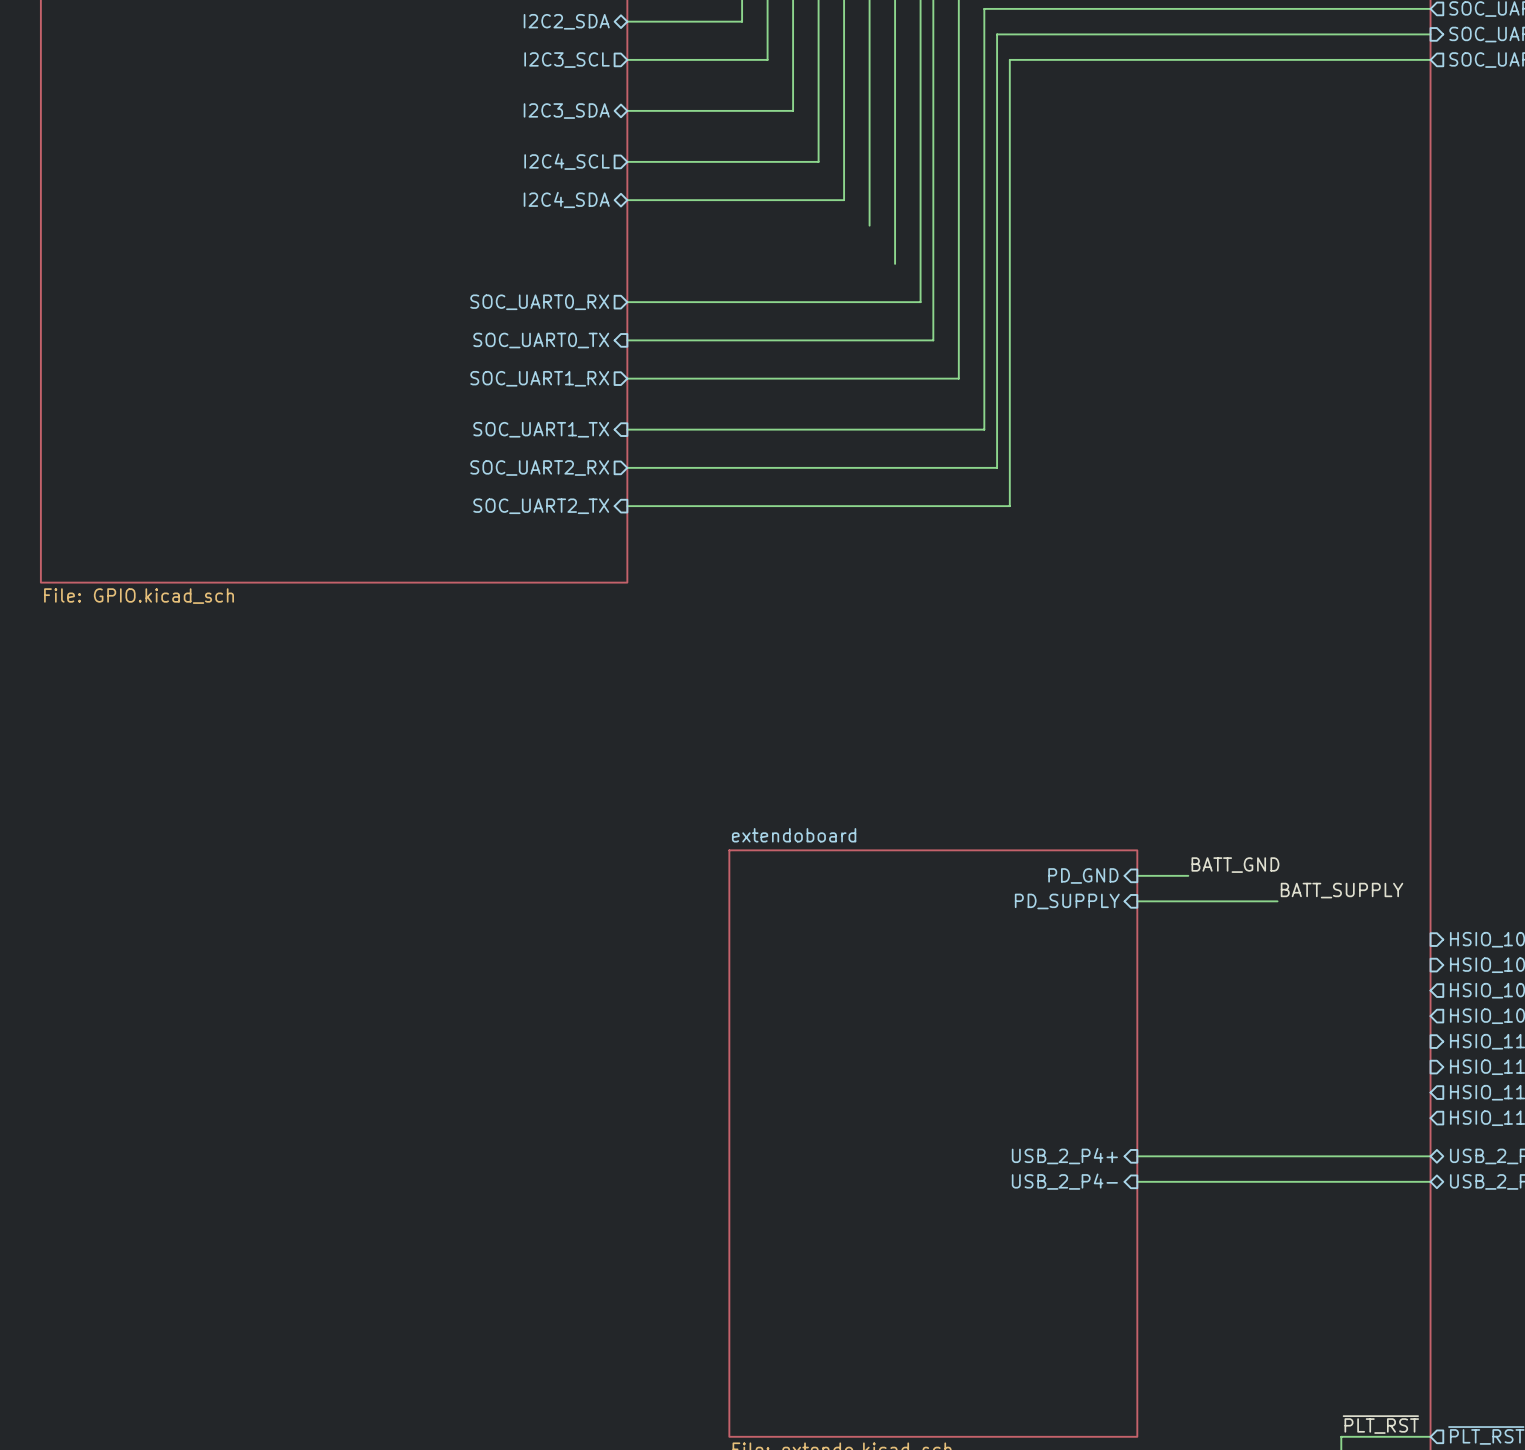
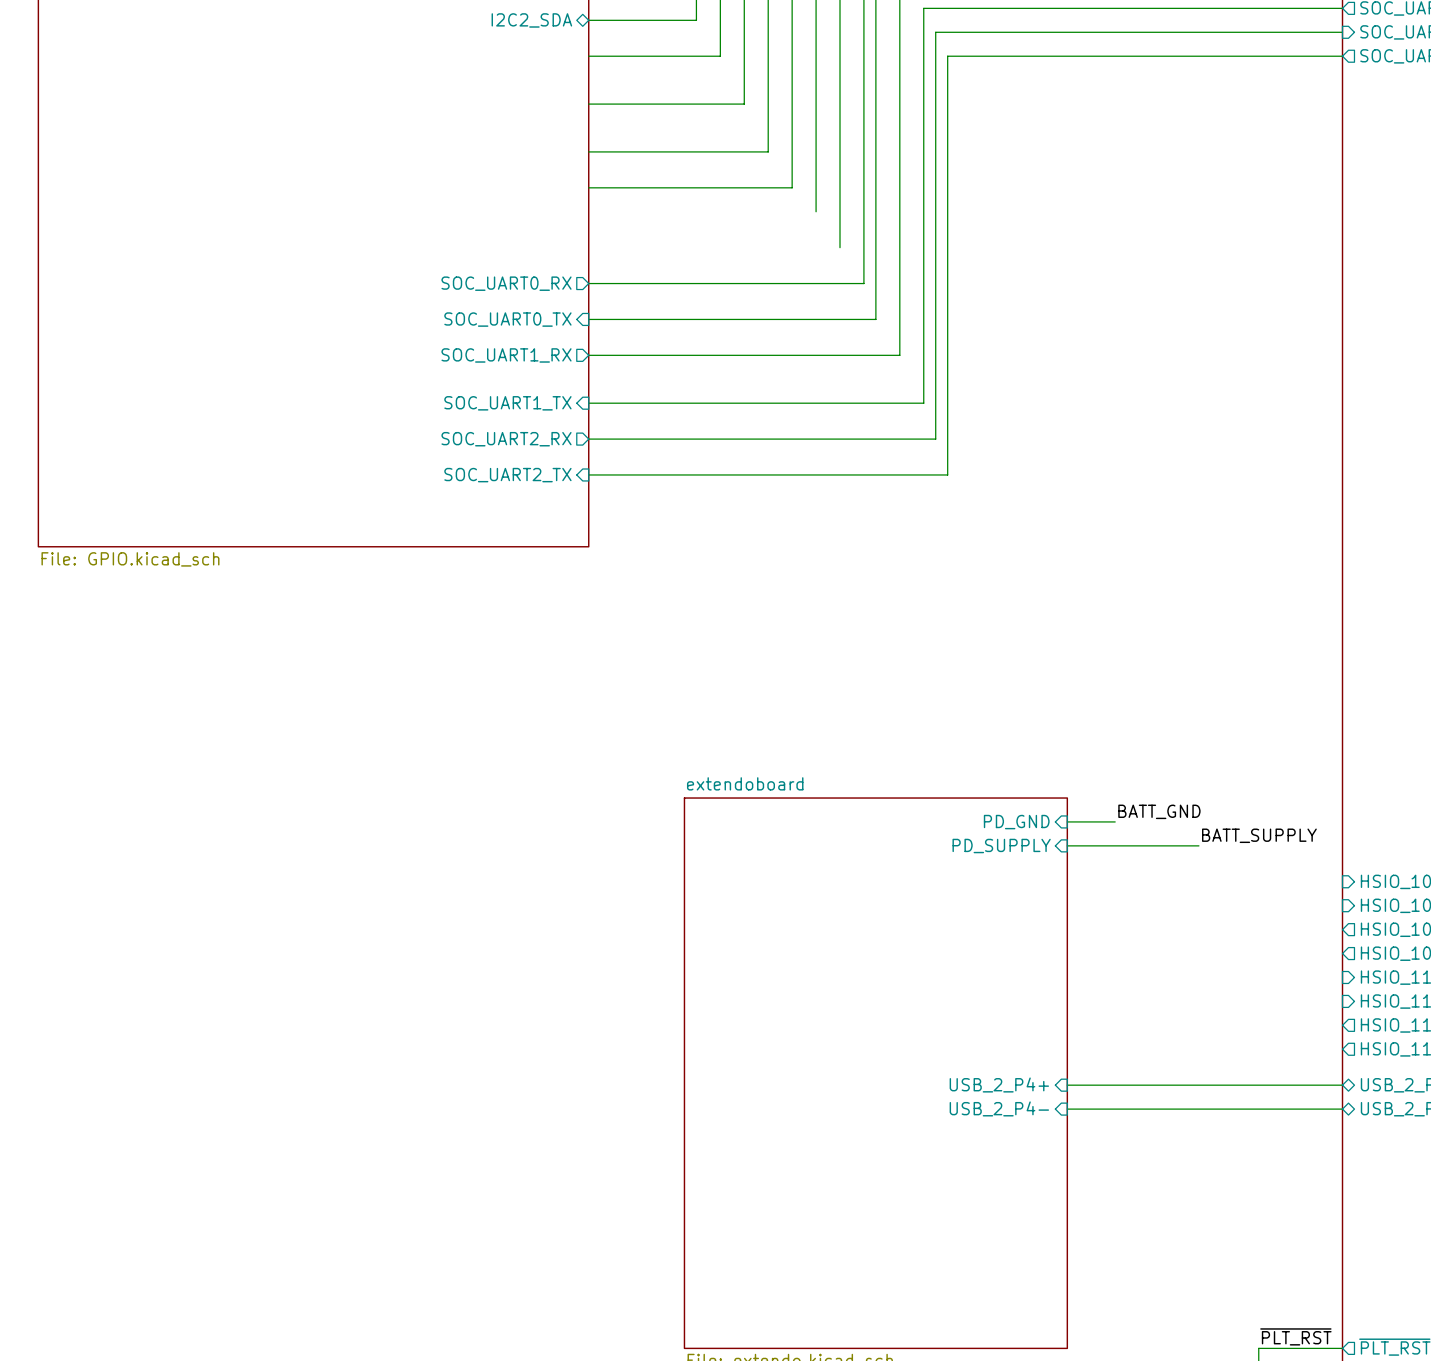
sheet pin: I2C3_SCL (567, 60) -> none
sheet pin: I2C3_SDA (566, 111) -> none
sheet pin: I2C4_SCL (567, 161) -> none
sheet pin: I2C4_SDA (566, 199) -> none

